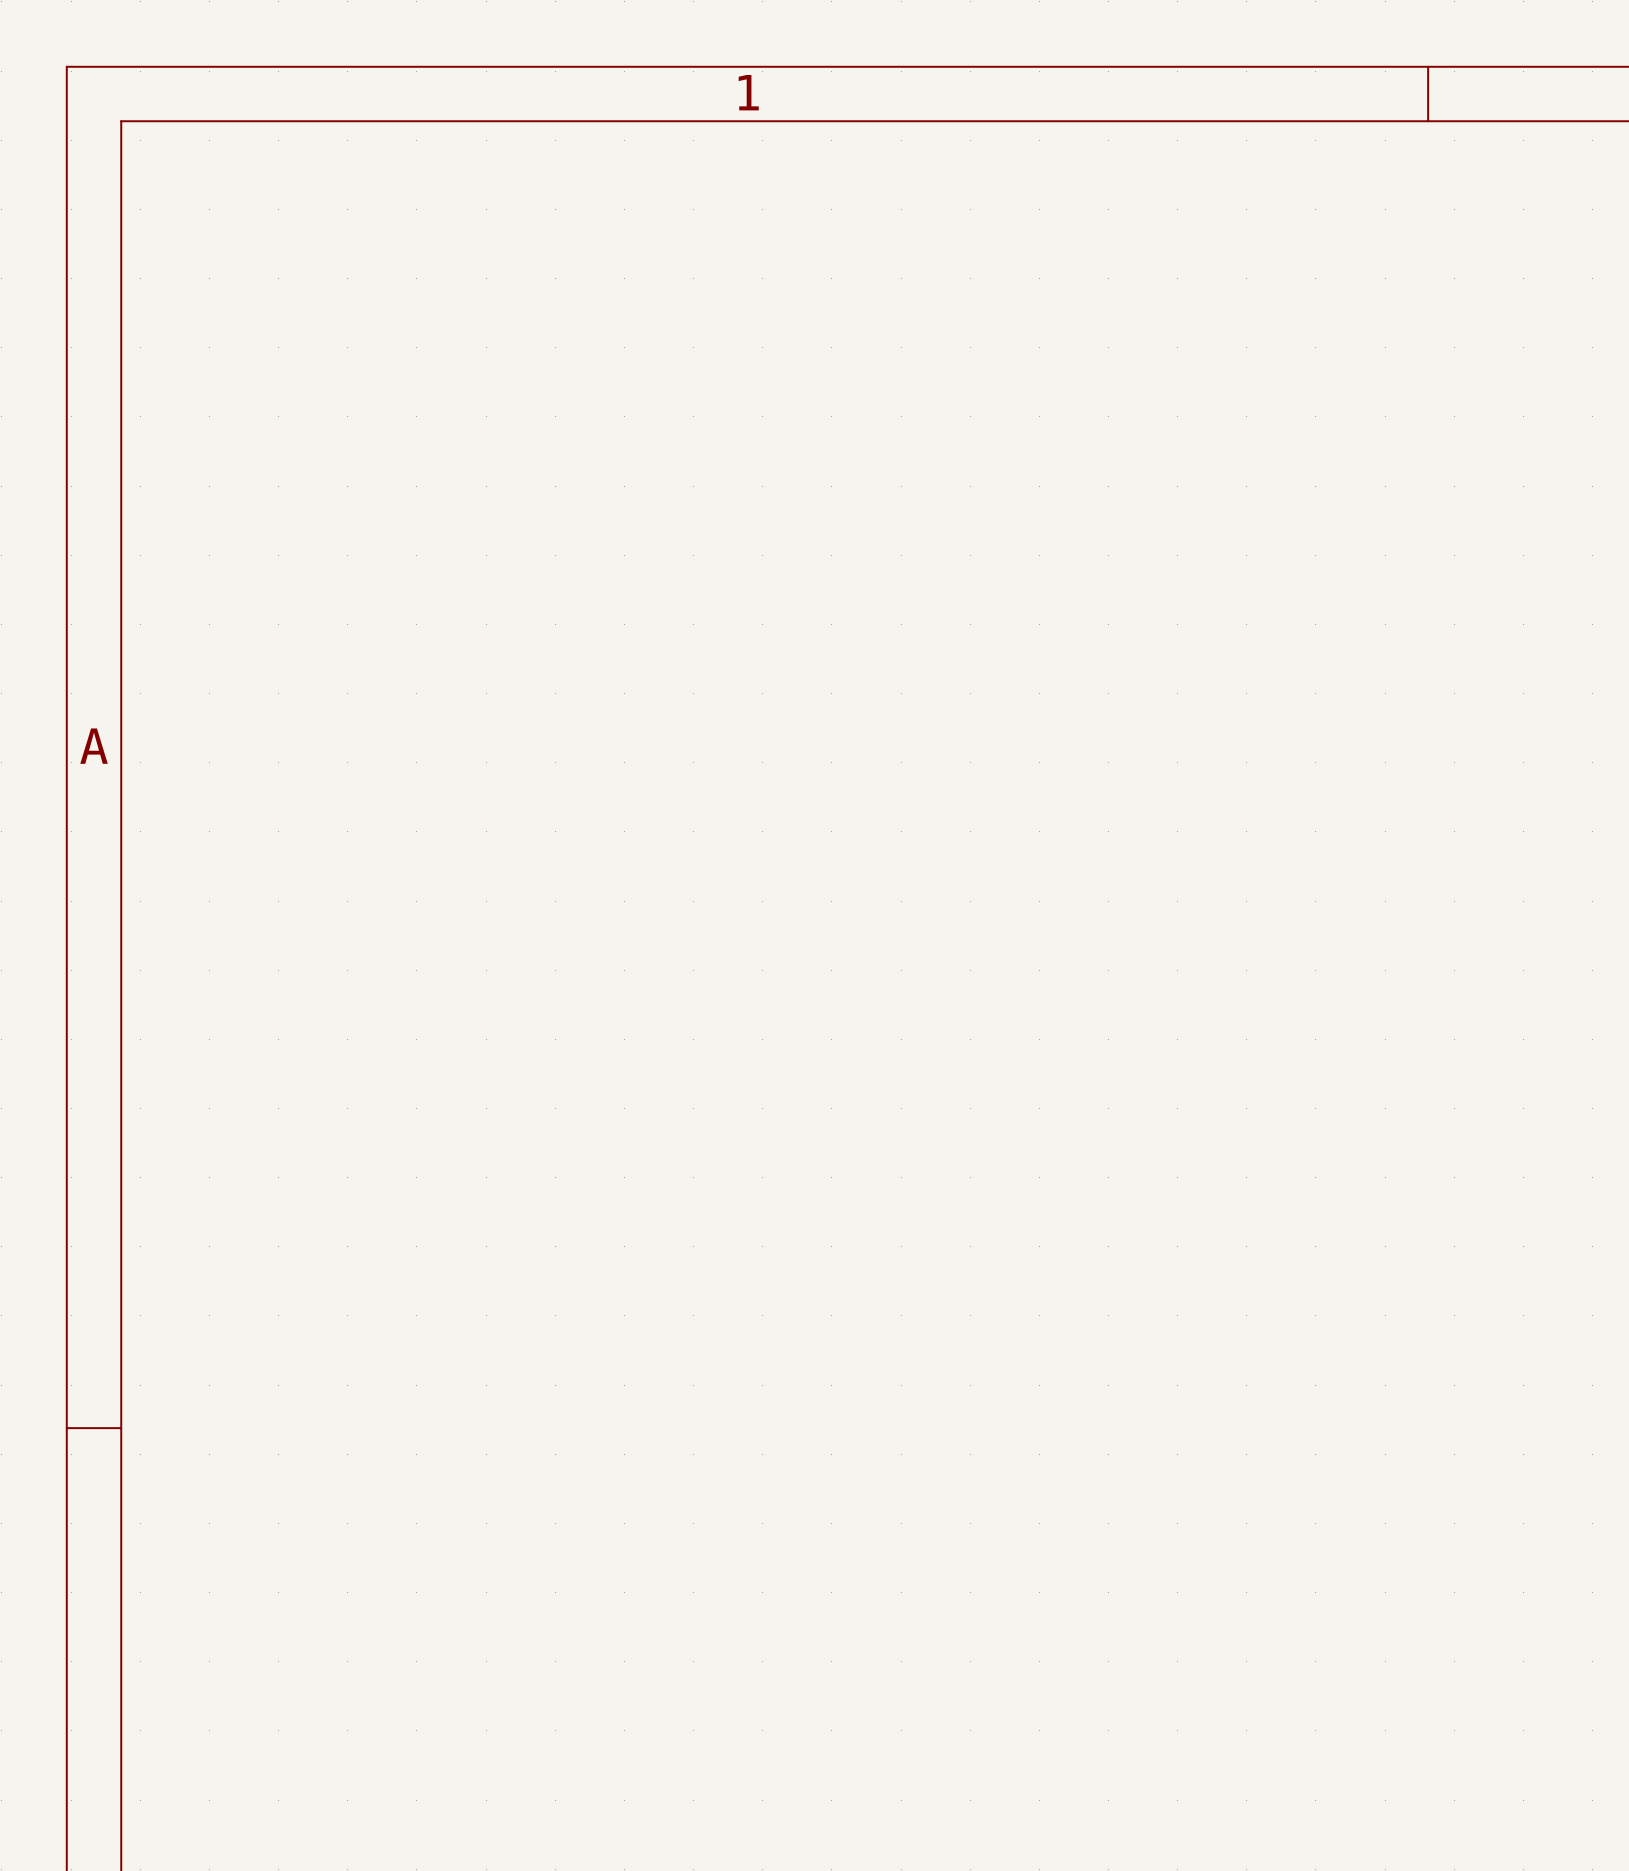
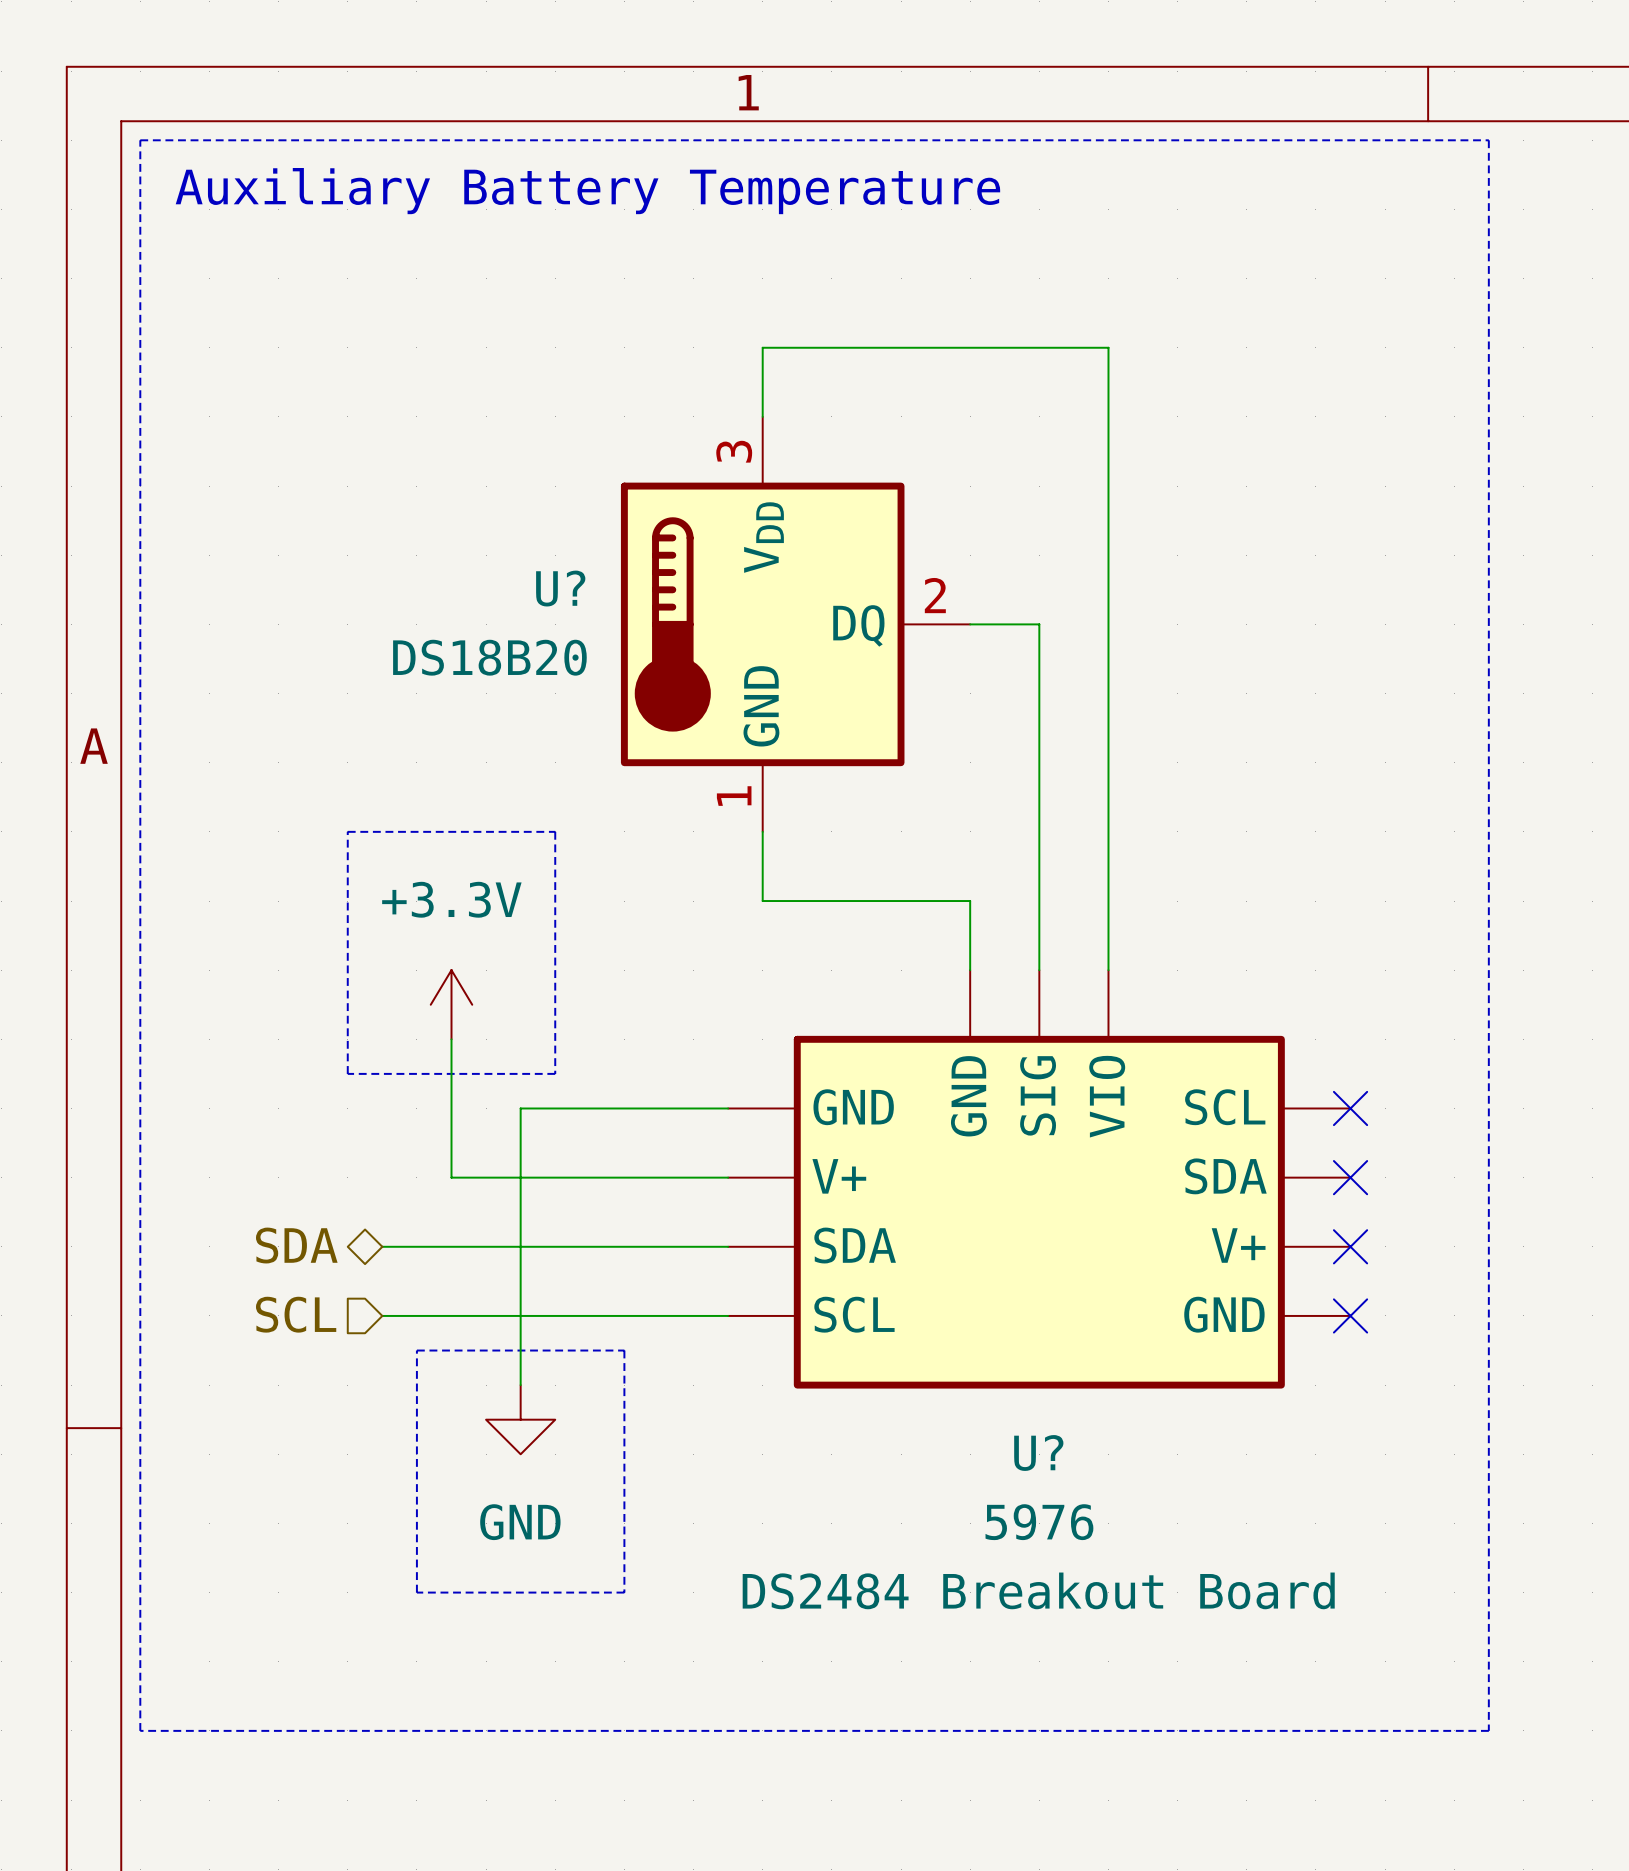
line: none -> (140, 140) (1488, 140) (1488, 1730) (140, 1730) (140, 140)
text: none -> Auxiliary Battery Temperature (587, 191)
wire: none -> (762, 416) (762, 347) (1108, 347) (1108, 970)
U?: none -> DS18B20 (795, 624)
wire: none -> (970, 624) (1039, 624) (1039, 970)
line: none -> (347, 831) (555, 831) (555, 1073) (347, 1073) (347, 831)
wire: none -> (762, 831) (762, 901) (970, 901) (970, 970)
power symbol: none -> +3.3V (451, 1004)
wire: none -> (451, 1039) (451, 1177) (728, 1177)
wire: none -> (728, 1108) (520, 1108) (520, 1385)
no-connect mark: none -> (1350, 1108)
no-connect mark: none -> (1350, 1177)
U?: none -> 5976 (1039, 1179)
hierarchical label: none -> SDA (296, 1245)
wire: none -> (382, 1246) (728, 1246)
no-connect mark: none -> (1350, 1246)
hierarchical label: none -> SCL (296, 1314)
wire: none -> (382, 1315) (728, 1315)
no-connect mark: none -> (1350, 1315)
line: none -> (416, 1350) (624, 1350) (624, 1592) (416, 1592) (416, 1350)
power symbol: none -> GND (520, 1419)

